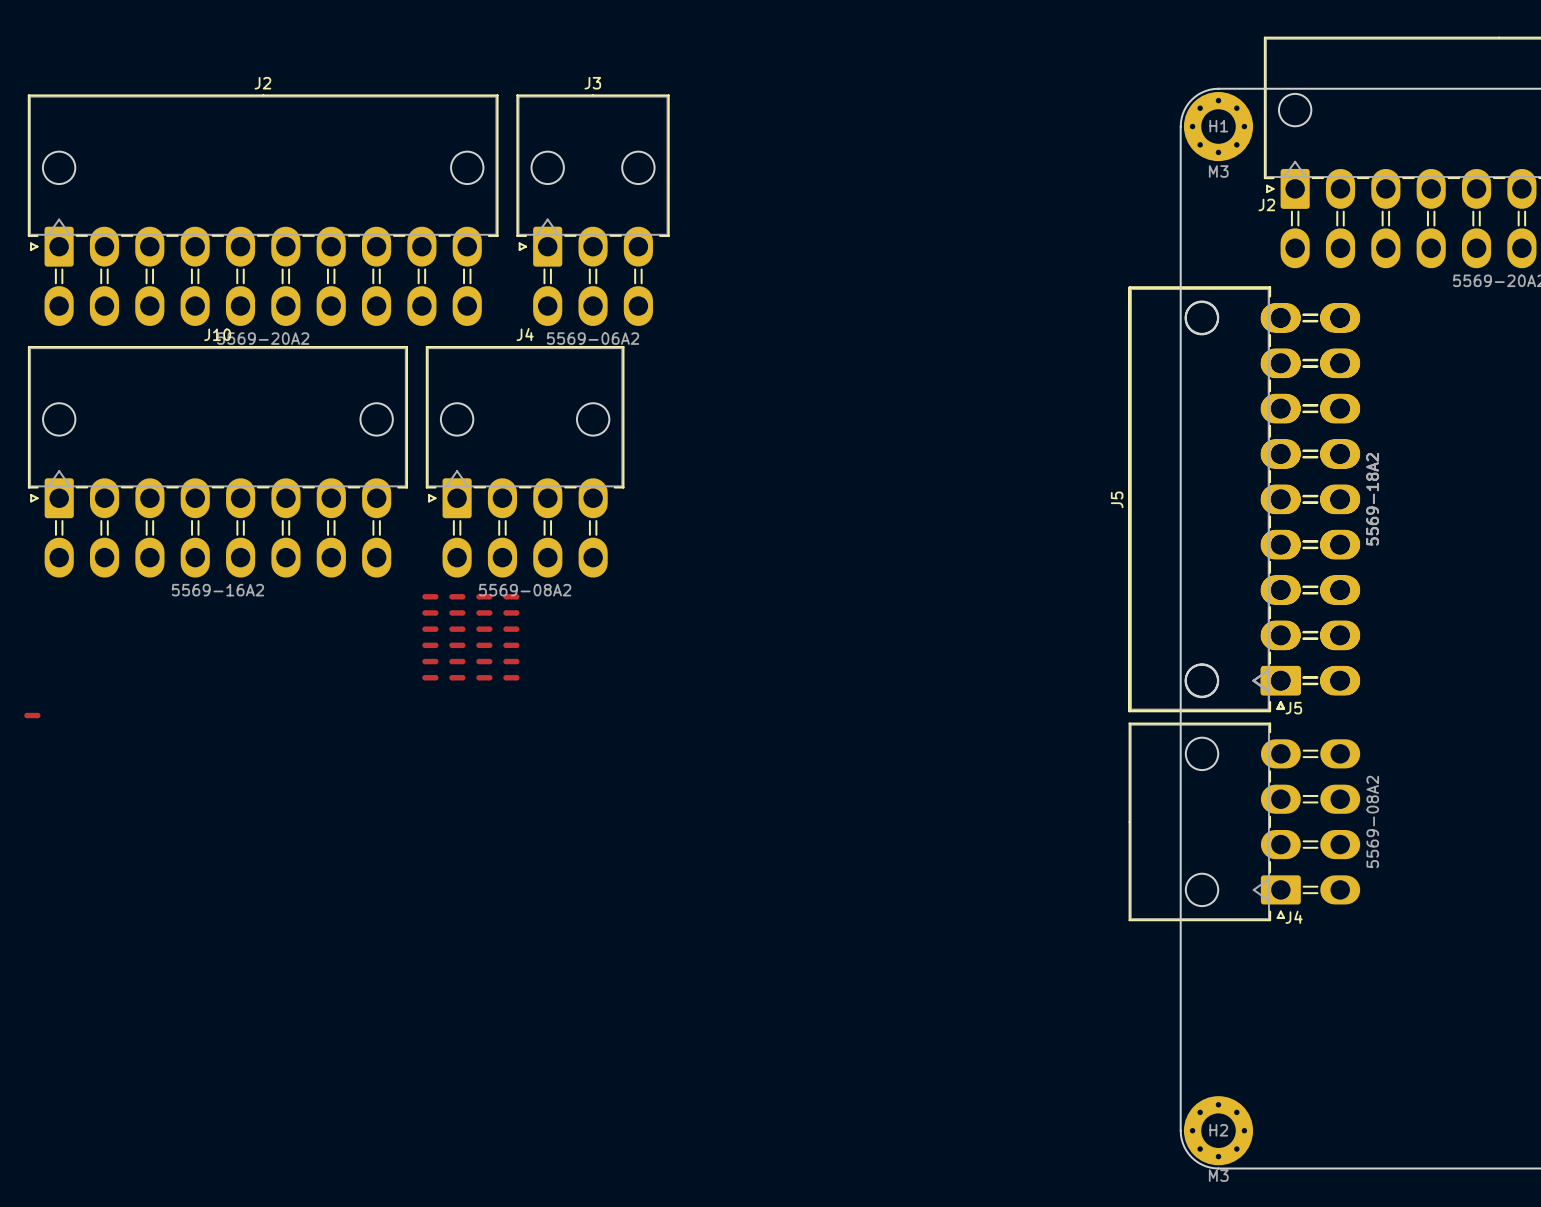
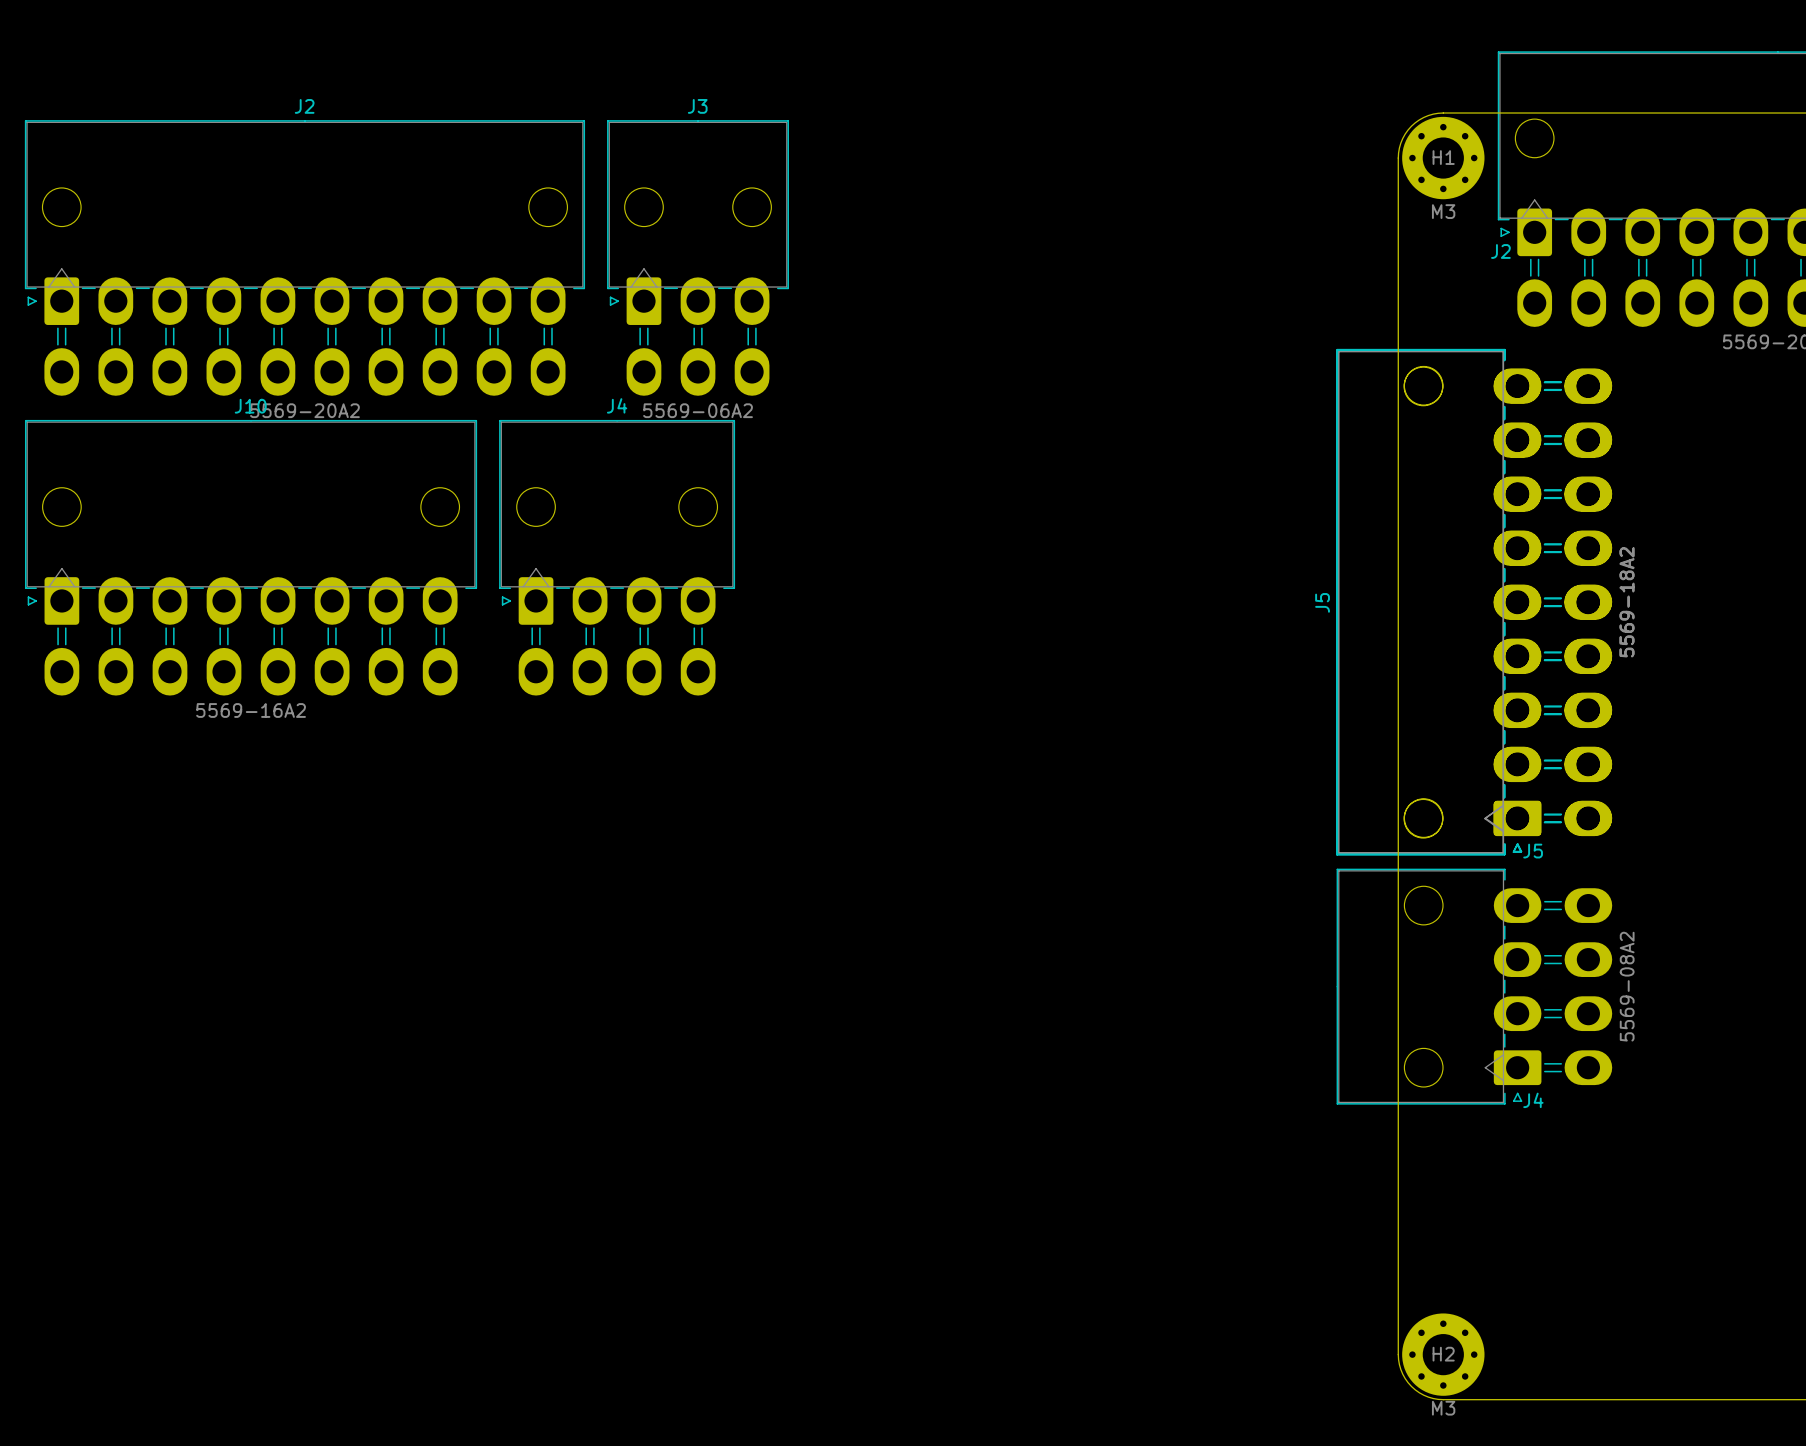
J4 value: 5569-08A2 (525, 590) -> none
part: (430, 596) -> none
part: (457, 596) -> none
part: (484, 596) -> none
part: (511, 596) -> none
part: (430, 612) -> none
part: (457, 612) -> none
part: (484, 612) -> none
part: (511, 612) -> none
part: (430, 629) -> none
part: (457, 629) -> none
part: (484, 629) -> none
part: (511, 629) -> none
part: (430, 645) -> none
part: (457, 645) -> none
part: (484, 645) -> none
part: (511, 645) -> none
part: (430, 661) -> none
part: (457, 661) -> none
part: (484, 661) -> none
part: (511, 661) -> none
part: (430, 677) -> none
part: (457, 677) -> none
part: (484, 677) -> none
part: (511, 677) -> none
part: (32, 715) -> none

